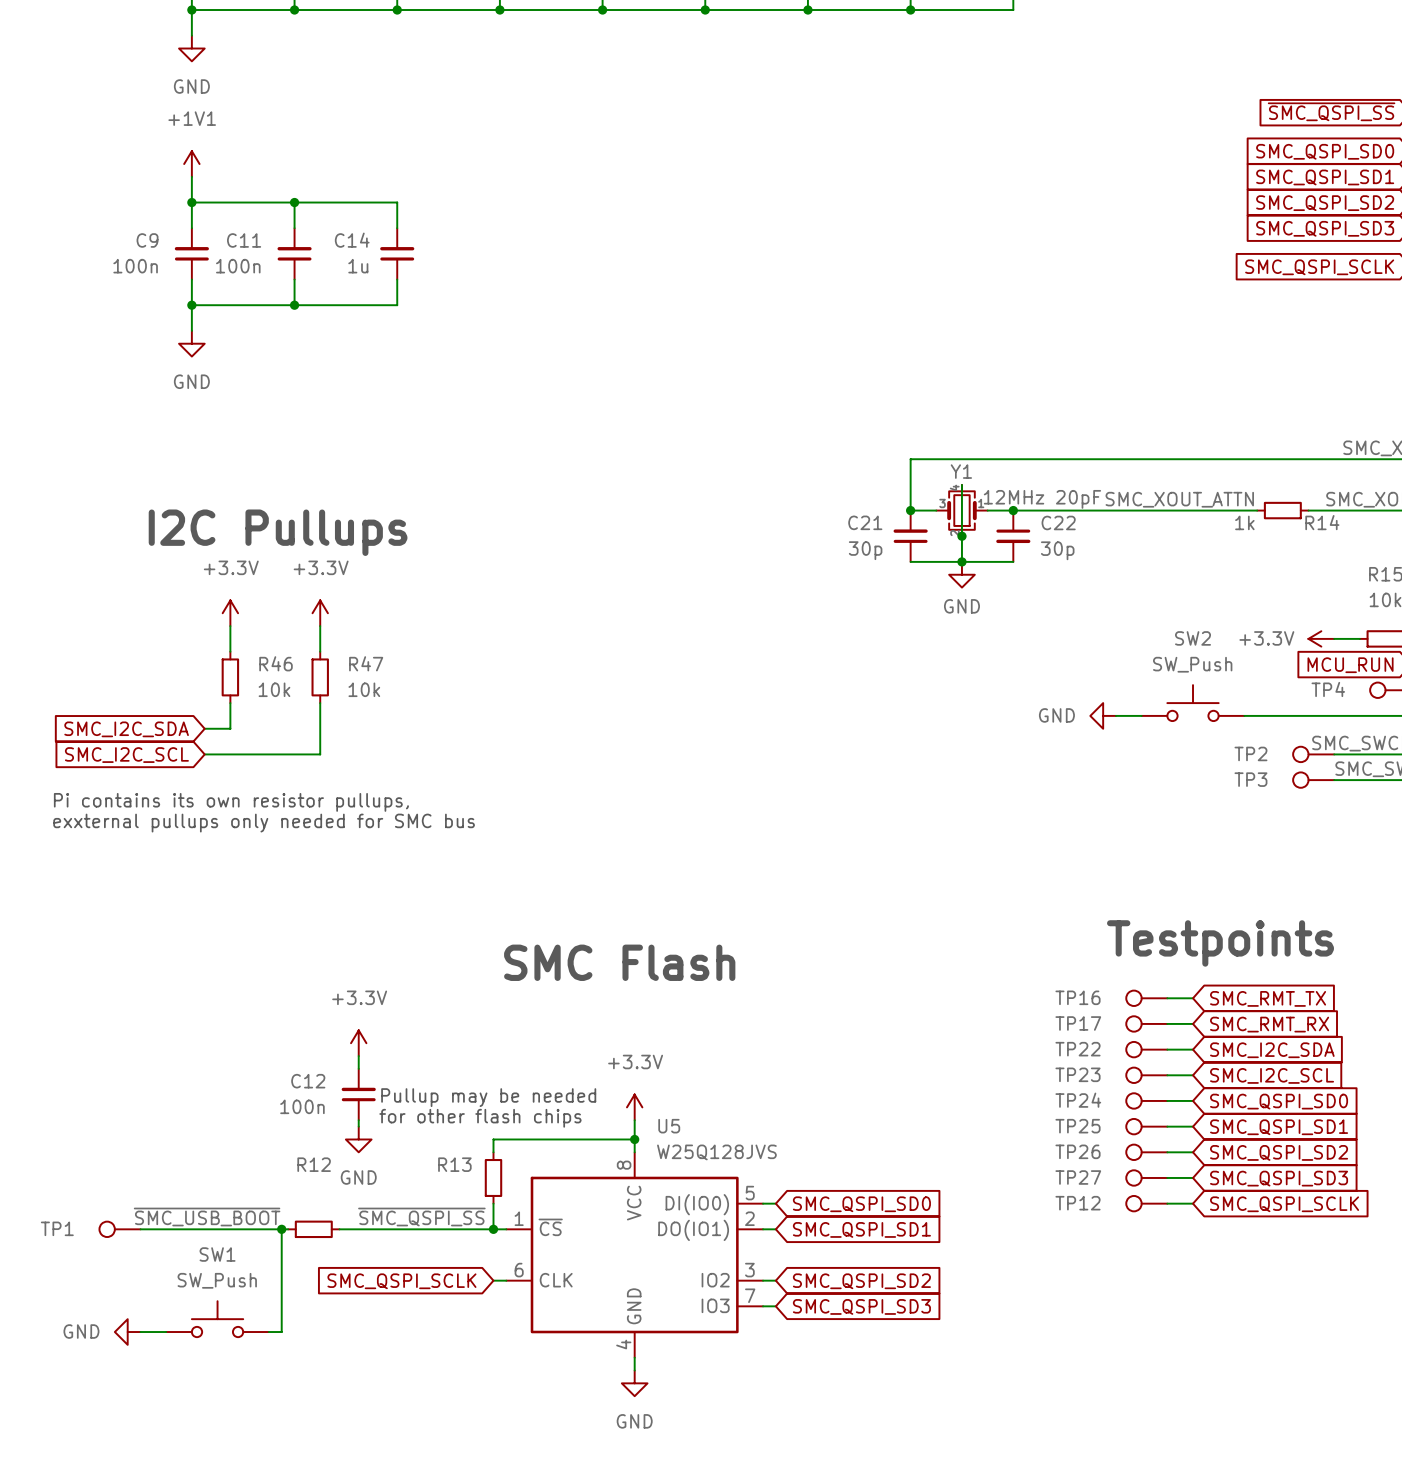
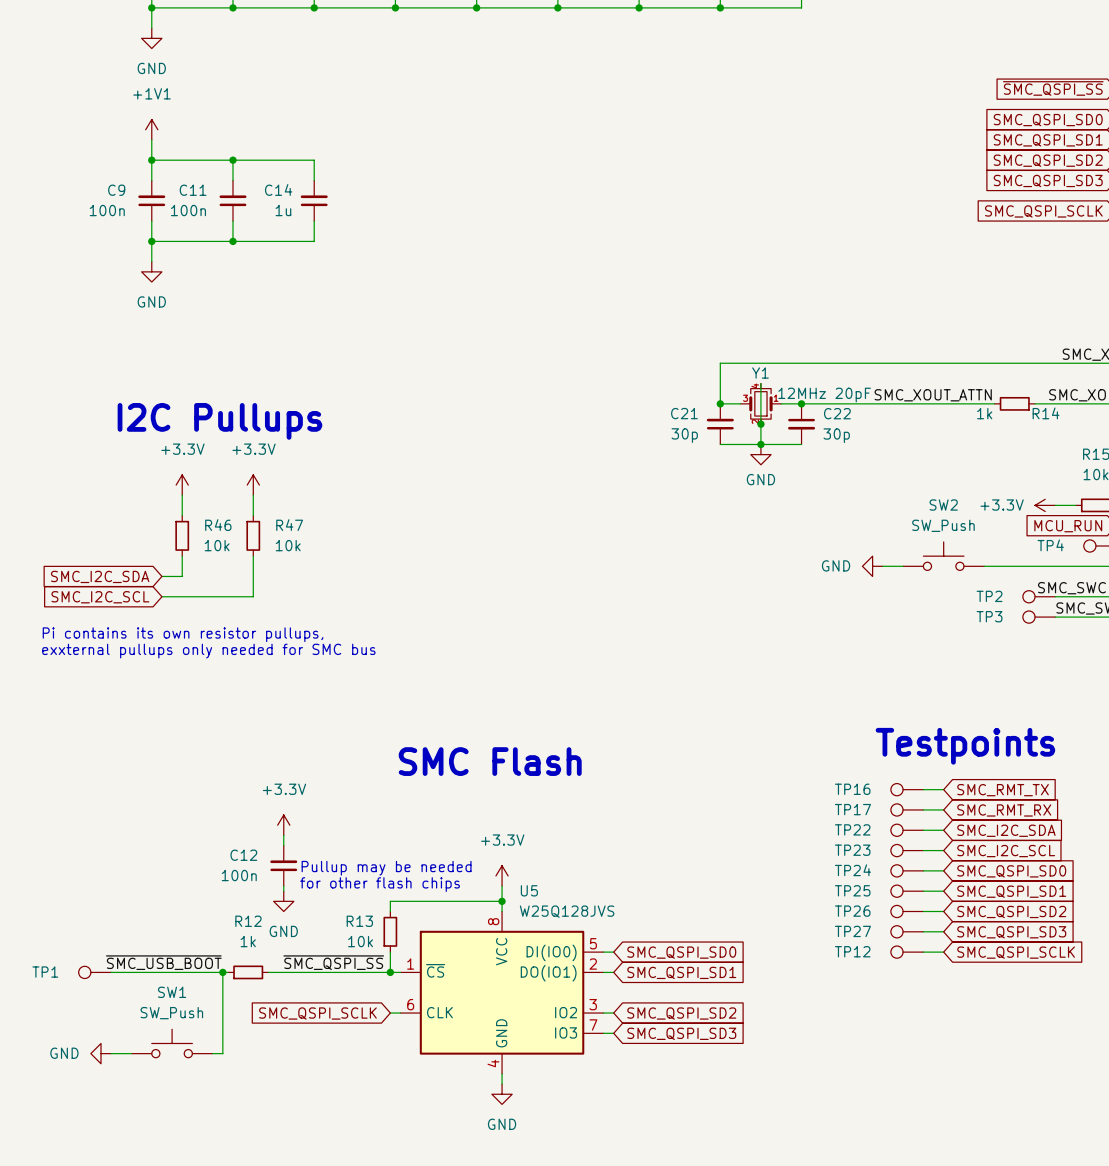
R12 value: none -> 1k (248, 941)
R13 value: none -> 10k (360, 941)

